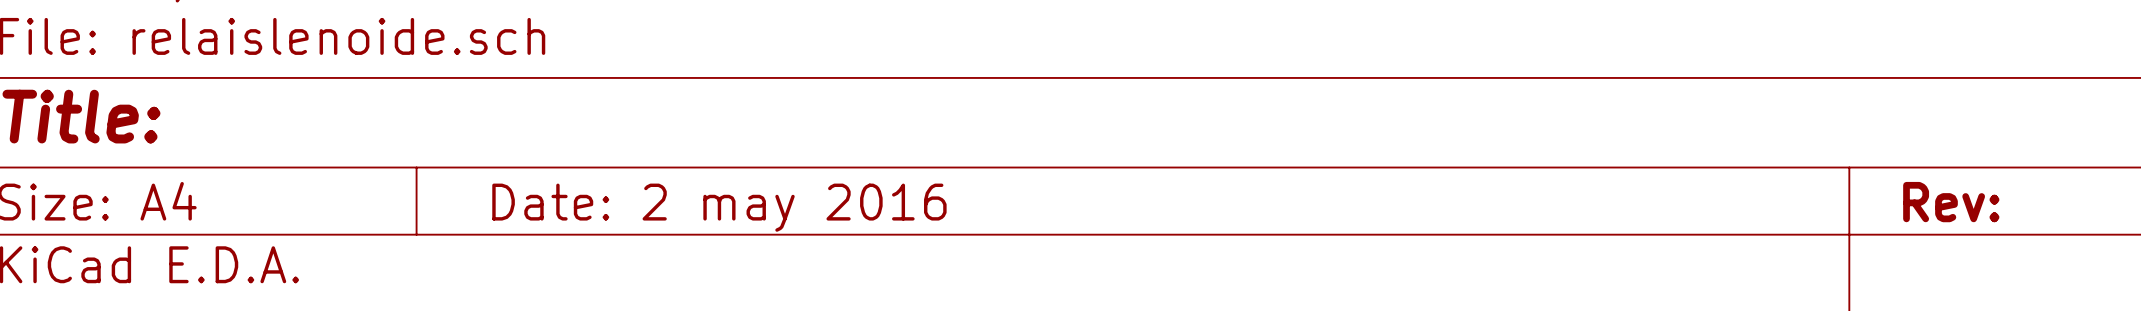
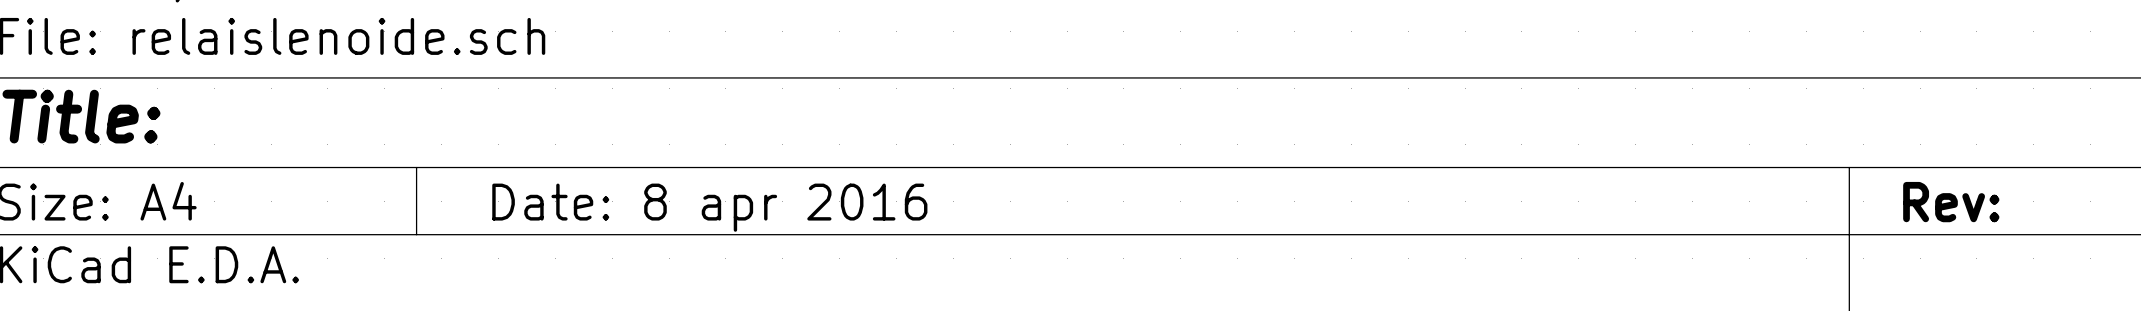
title block: Date: 2 may 2016 (719, 207) -> Date: 8 apr 2016 (709, 207)

